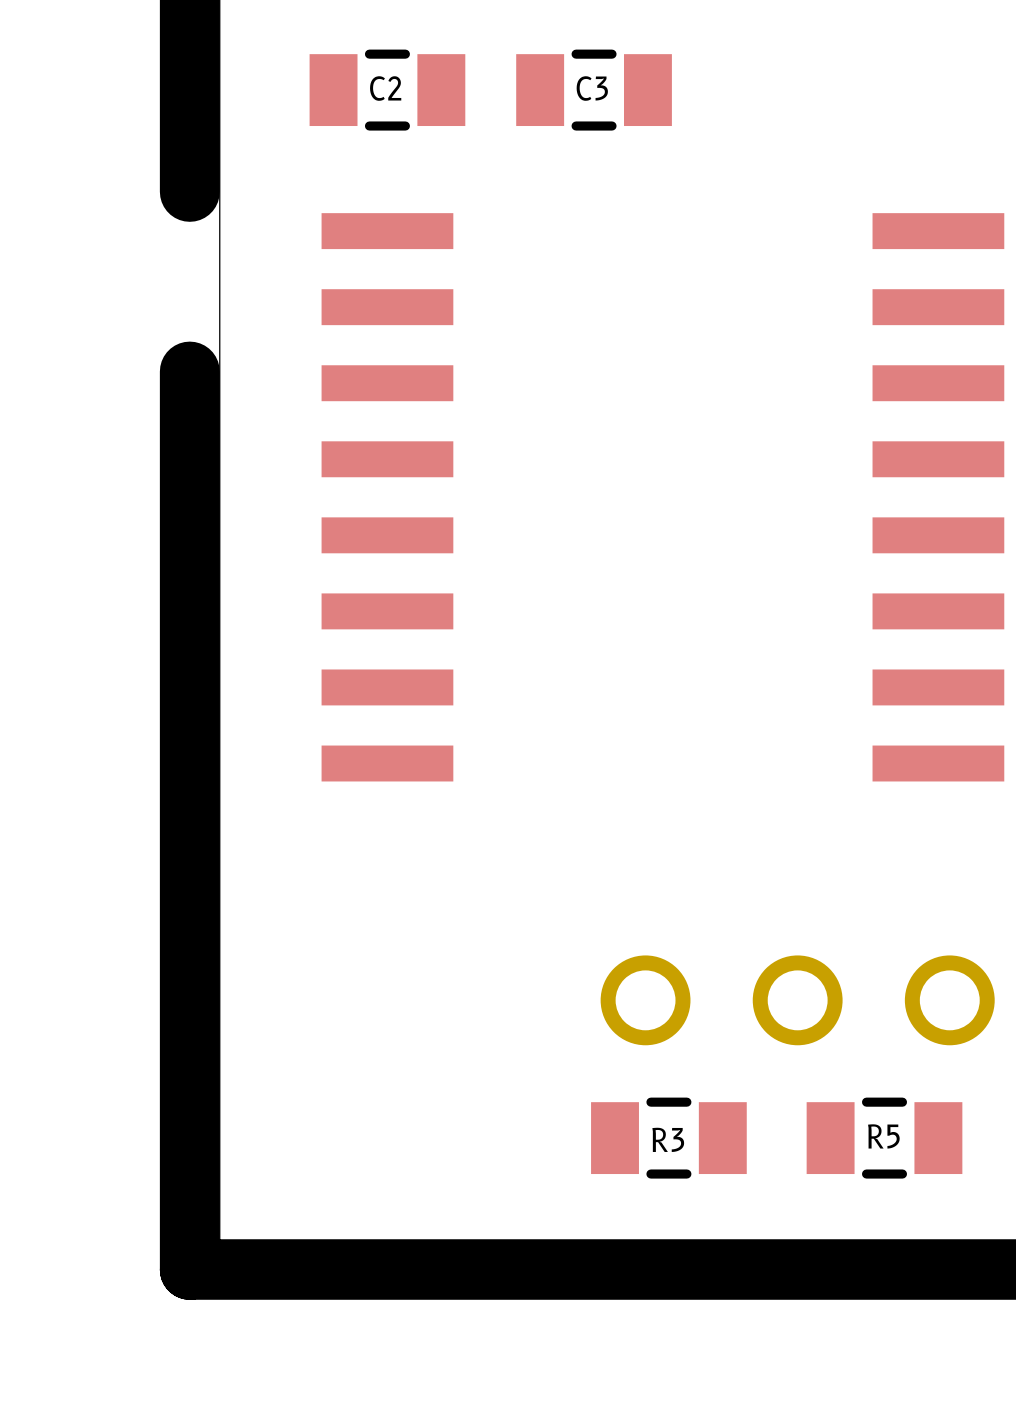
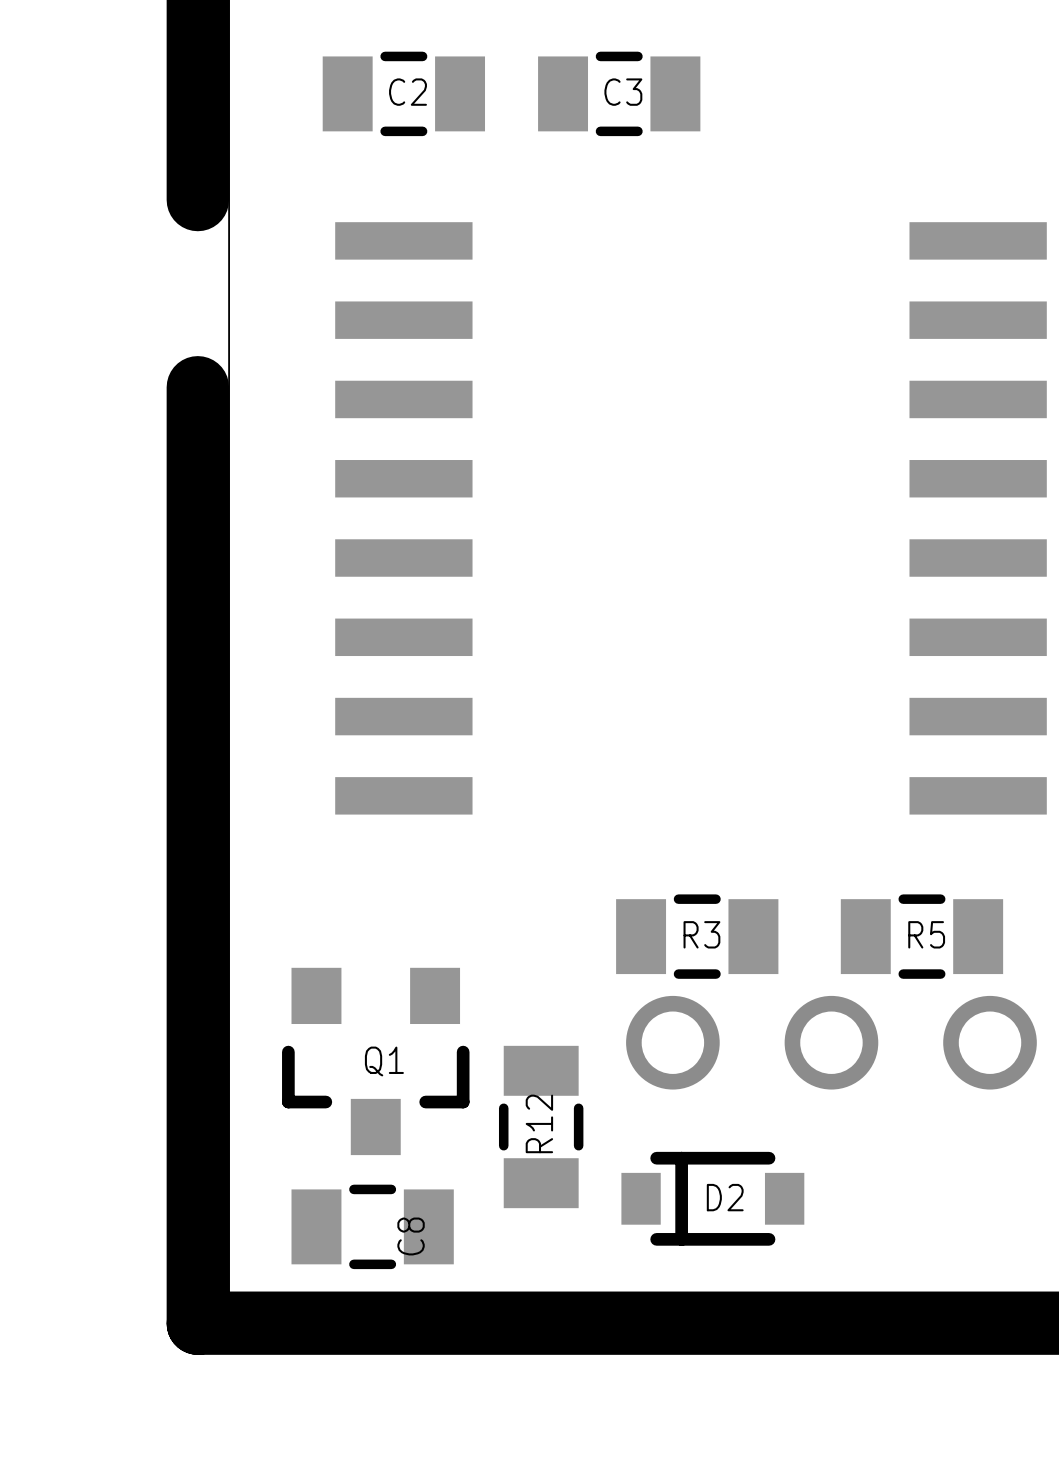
Q1: none -> (375, 1061)
R12: none -> (541, 1127)
R3 position: (668, 1138) -> (697, 936)
R5 position: (884, 1138) -> (921, 936)
R3 name position: R3 (668, 1139) -> R3 (701, 934)
D2: none -> (712, 1198)
C8: none -> (372, 1226)

